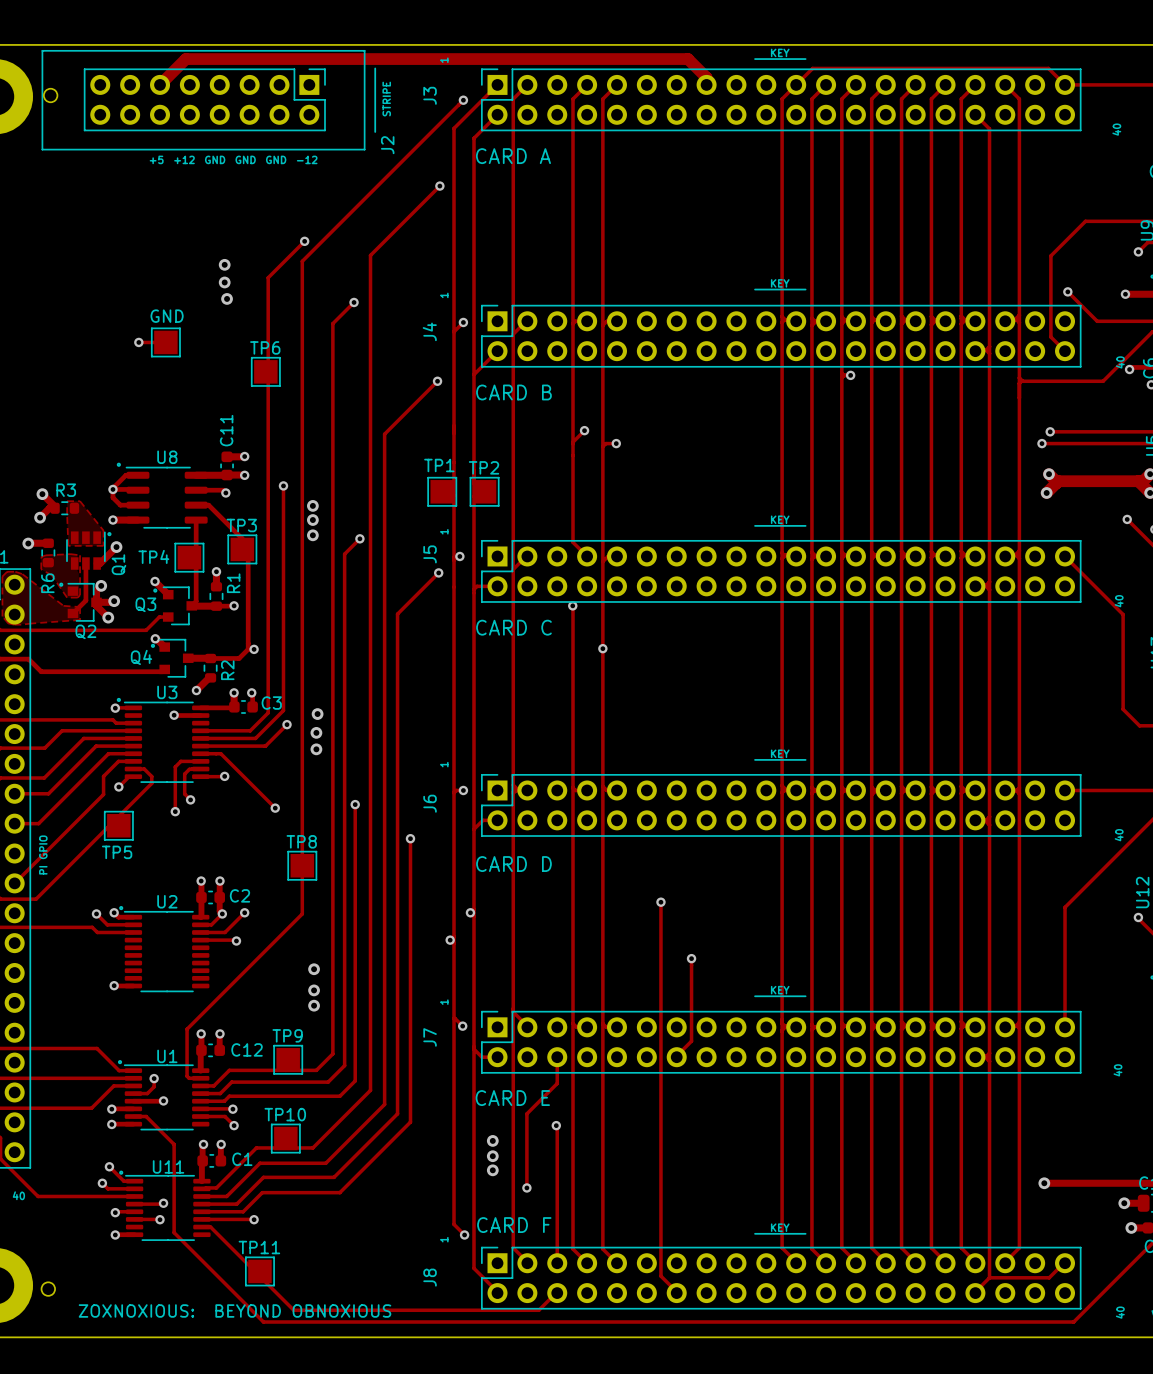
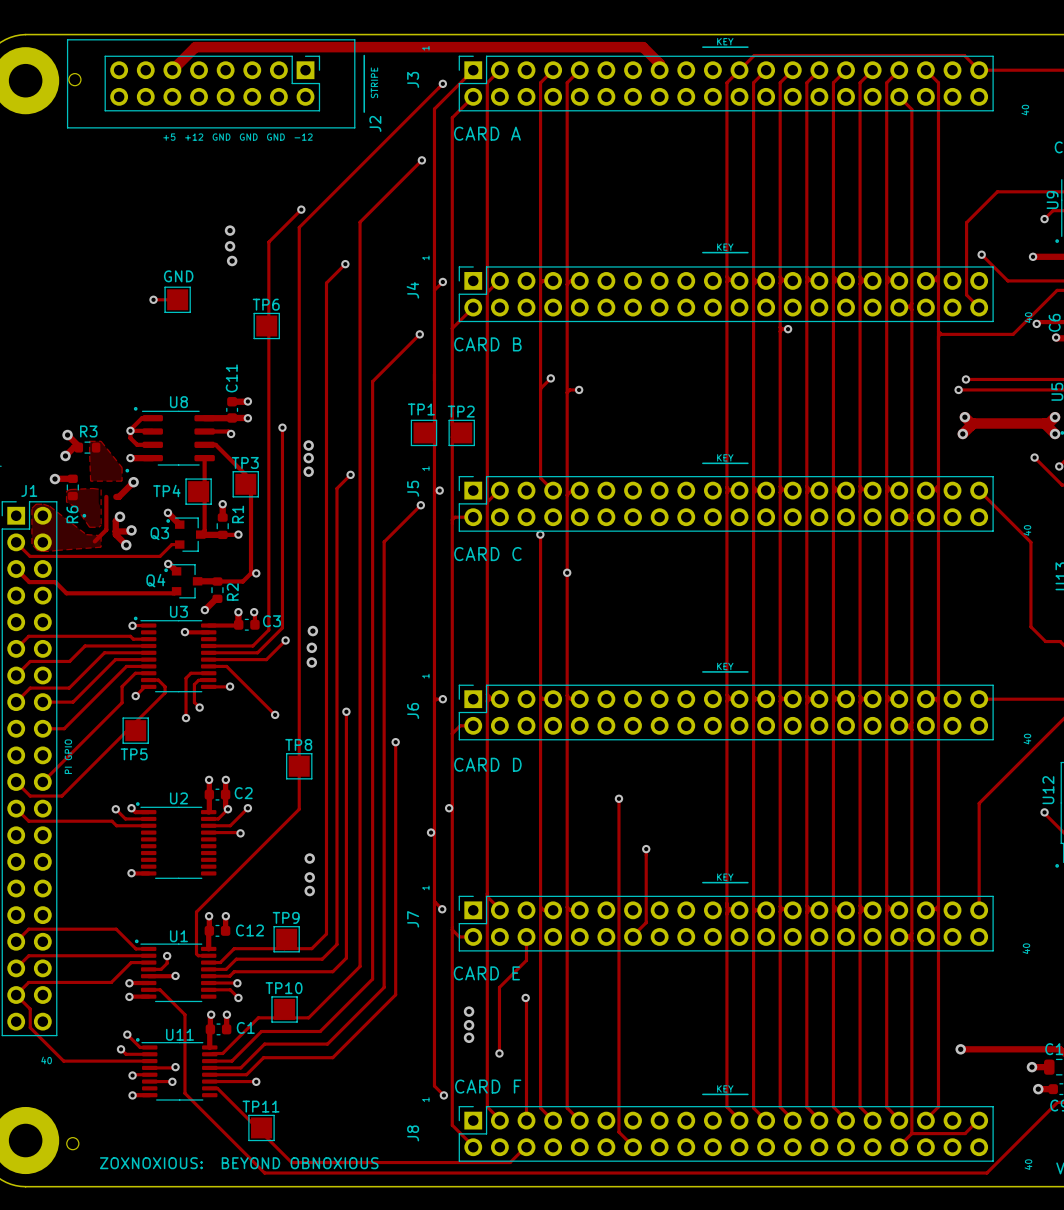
Q1: (85, 550) -> none
Q2: (84, 602) -> none

